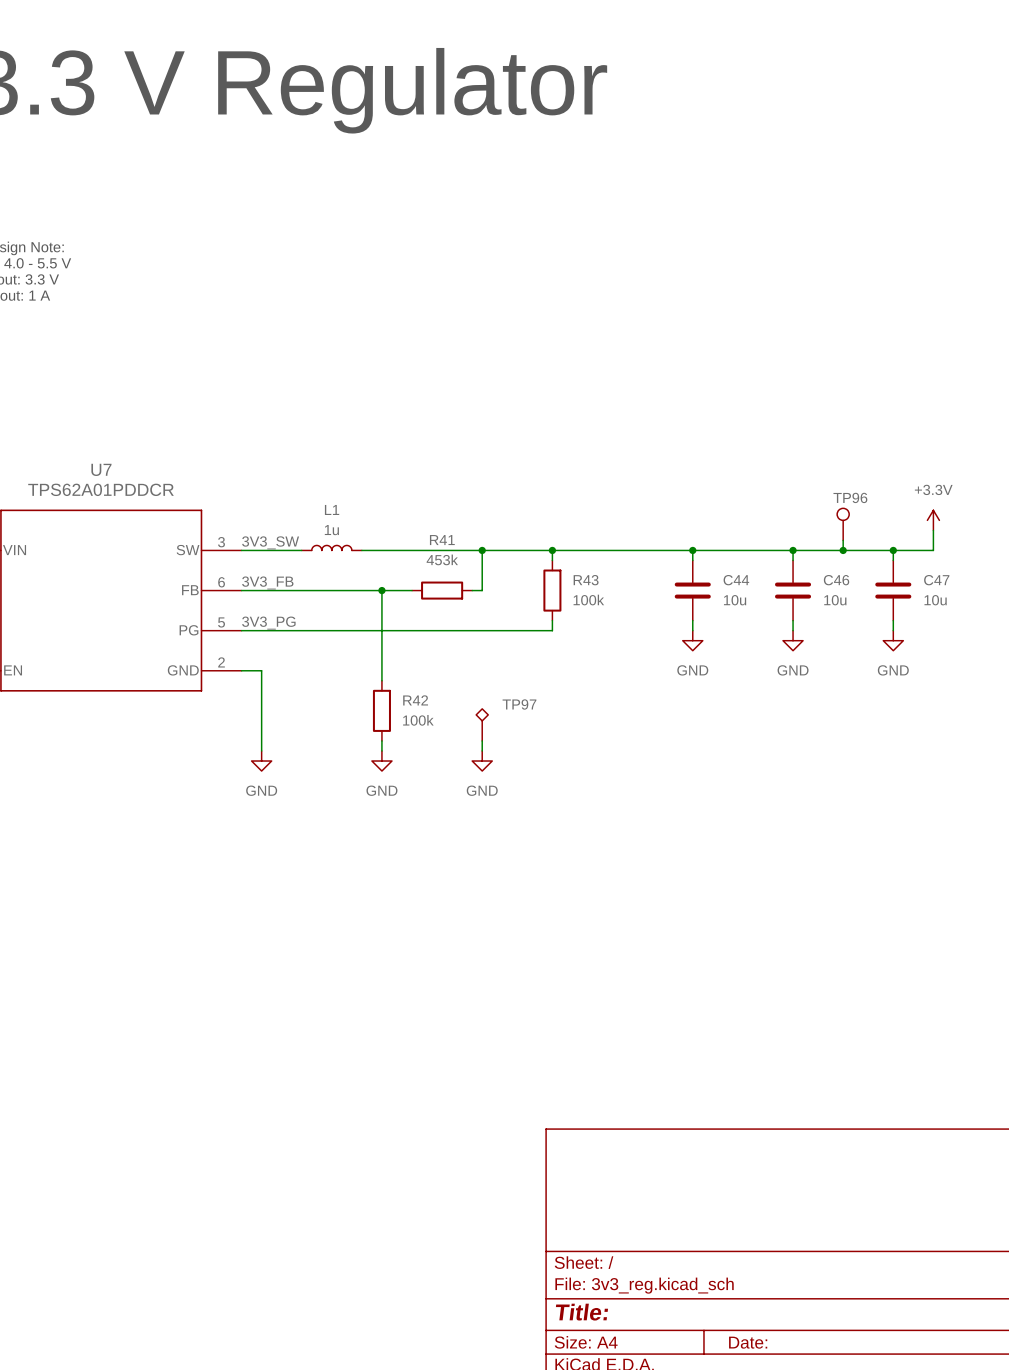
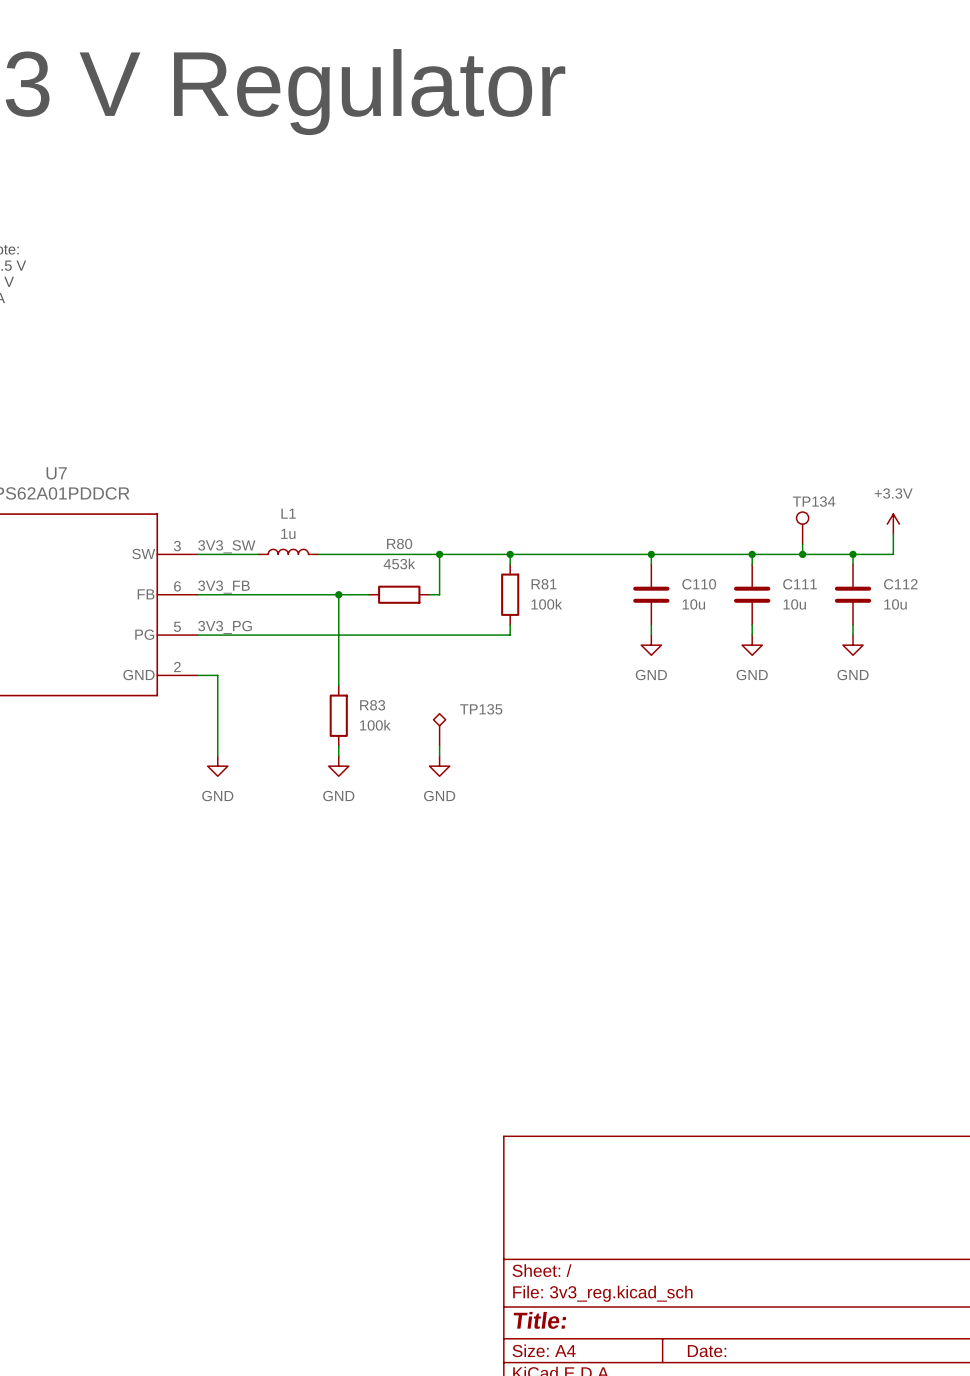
TP96 name: TP96 (850, 497) -> TP134 (814, 501)
R41 name: R41 (442, 540) -> R80 (399, 543)
R43 name: R43 (586, 580) -> R81 (544, 584)
C44 name: C44 (736, 580) -> C110 (699, 584)
C46 name: C46 (836, 580) -> C111 (799, 584)
C47 name: C47 (936, 580) -> C112 (900, 584)
R42 name: R42 (415, 700) -> R83 (372, 705)
TP97 name: TP97 (519, 704) -> TP135 (481, 709)

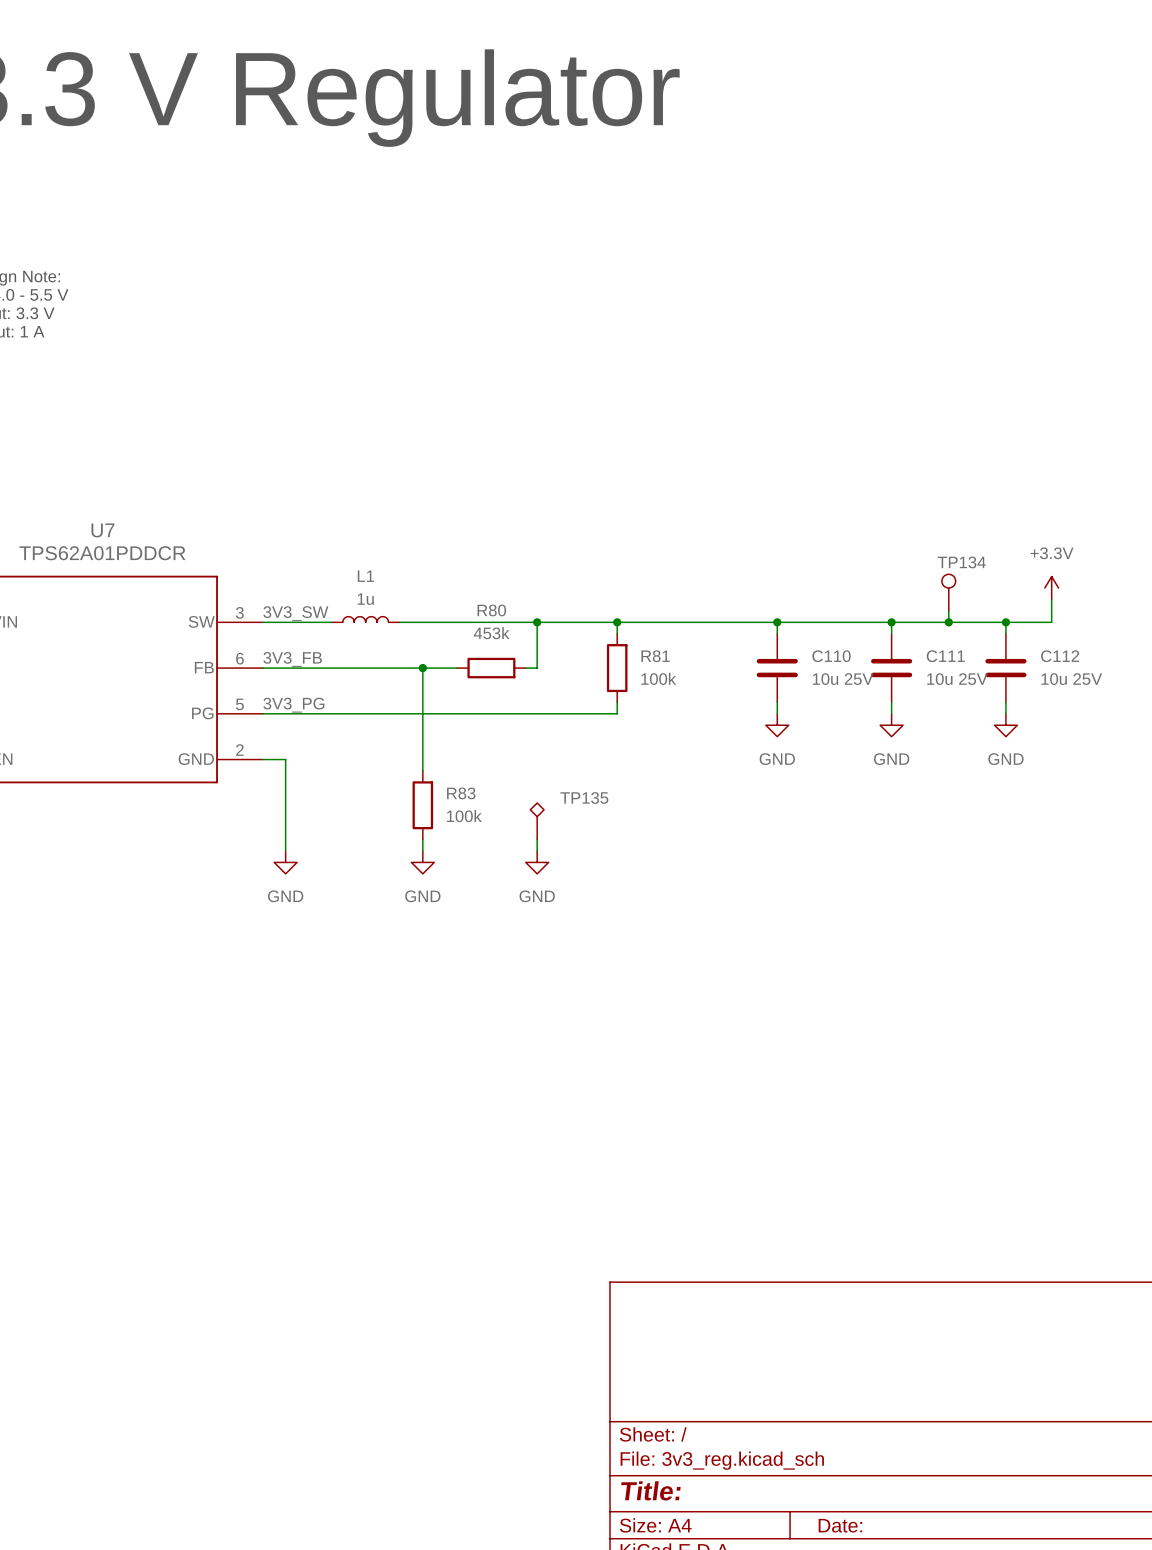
C110 value: 10u (693, 604) -> 10u 25V (843, 679)
C111 value: 10u (794, 604) -> 10u 25V (957, 679)
C112 value: 10u (895, 604) -> 10u 25V (1071, 679)

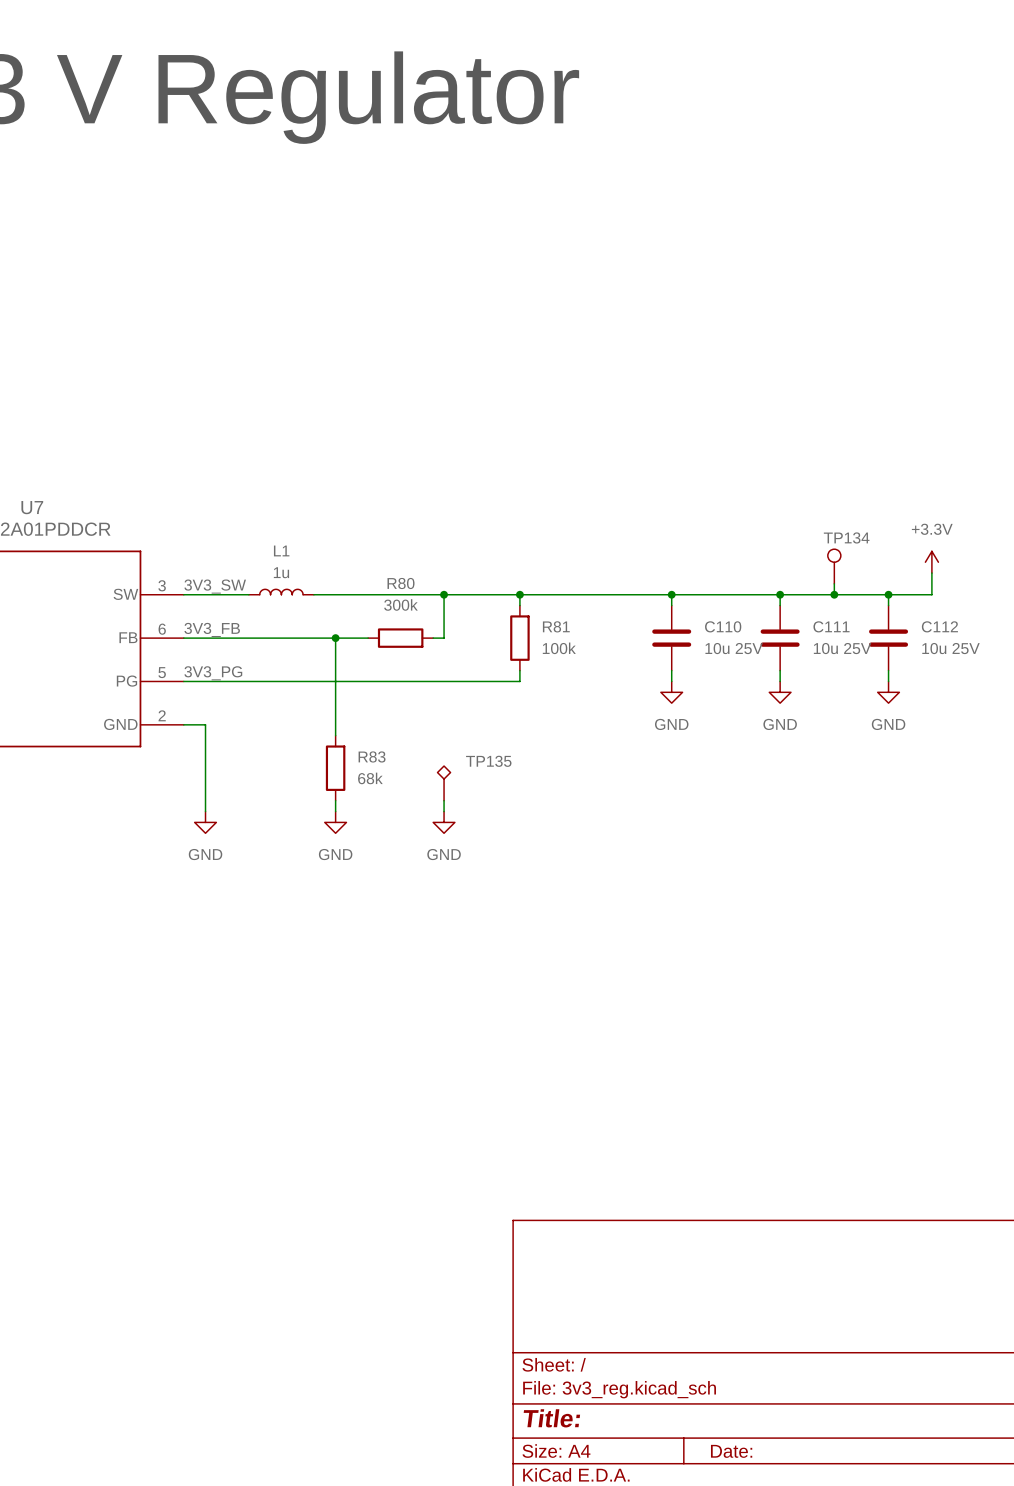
R80 value: 453k (491, 633) -> 300k (400, 604)
R83 value: 100k (464, 816) -> 68k (370, 778)

